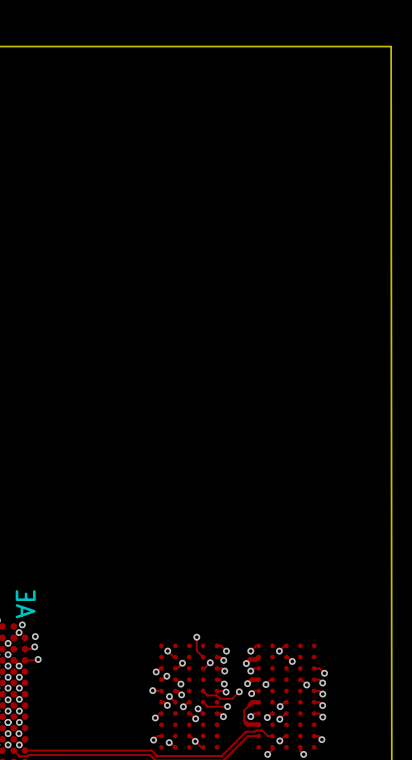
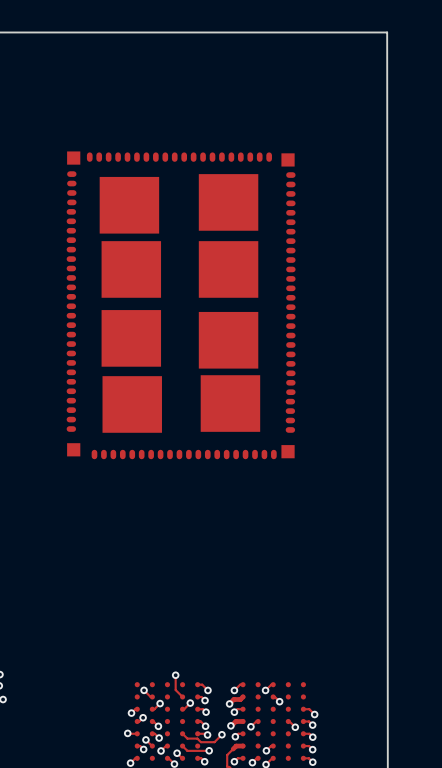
part: none -> (181, 305)

